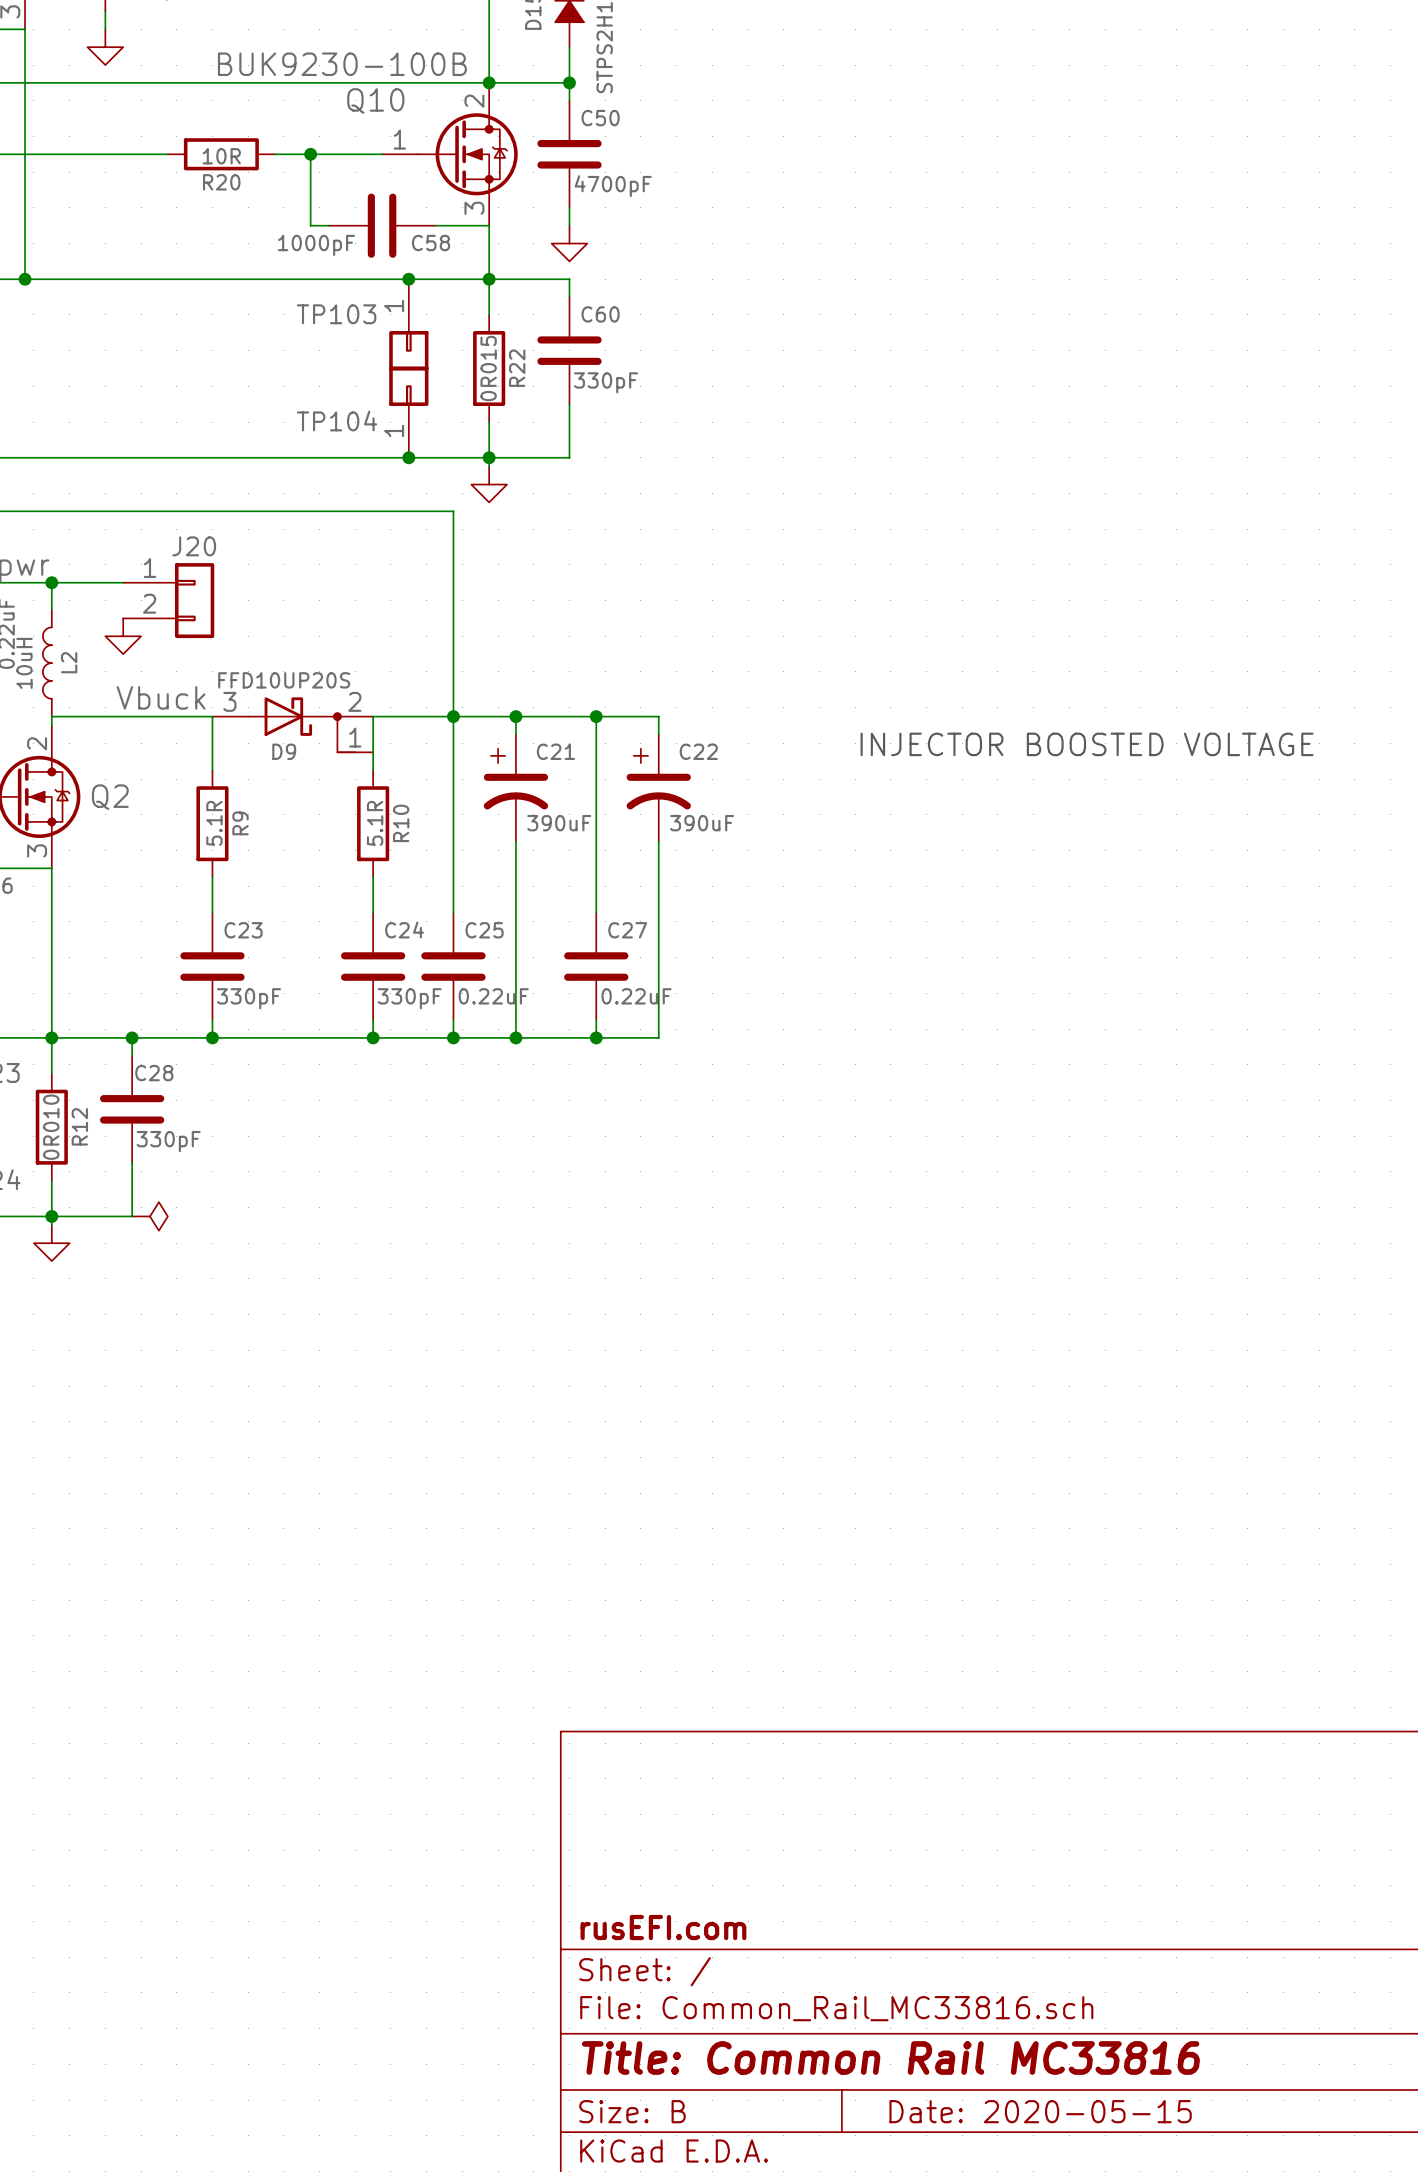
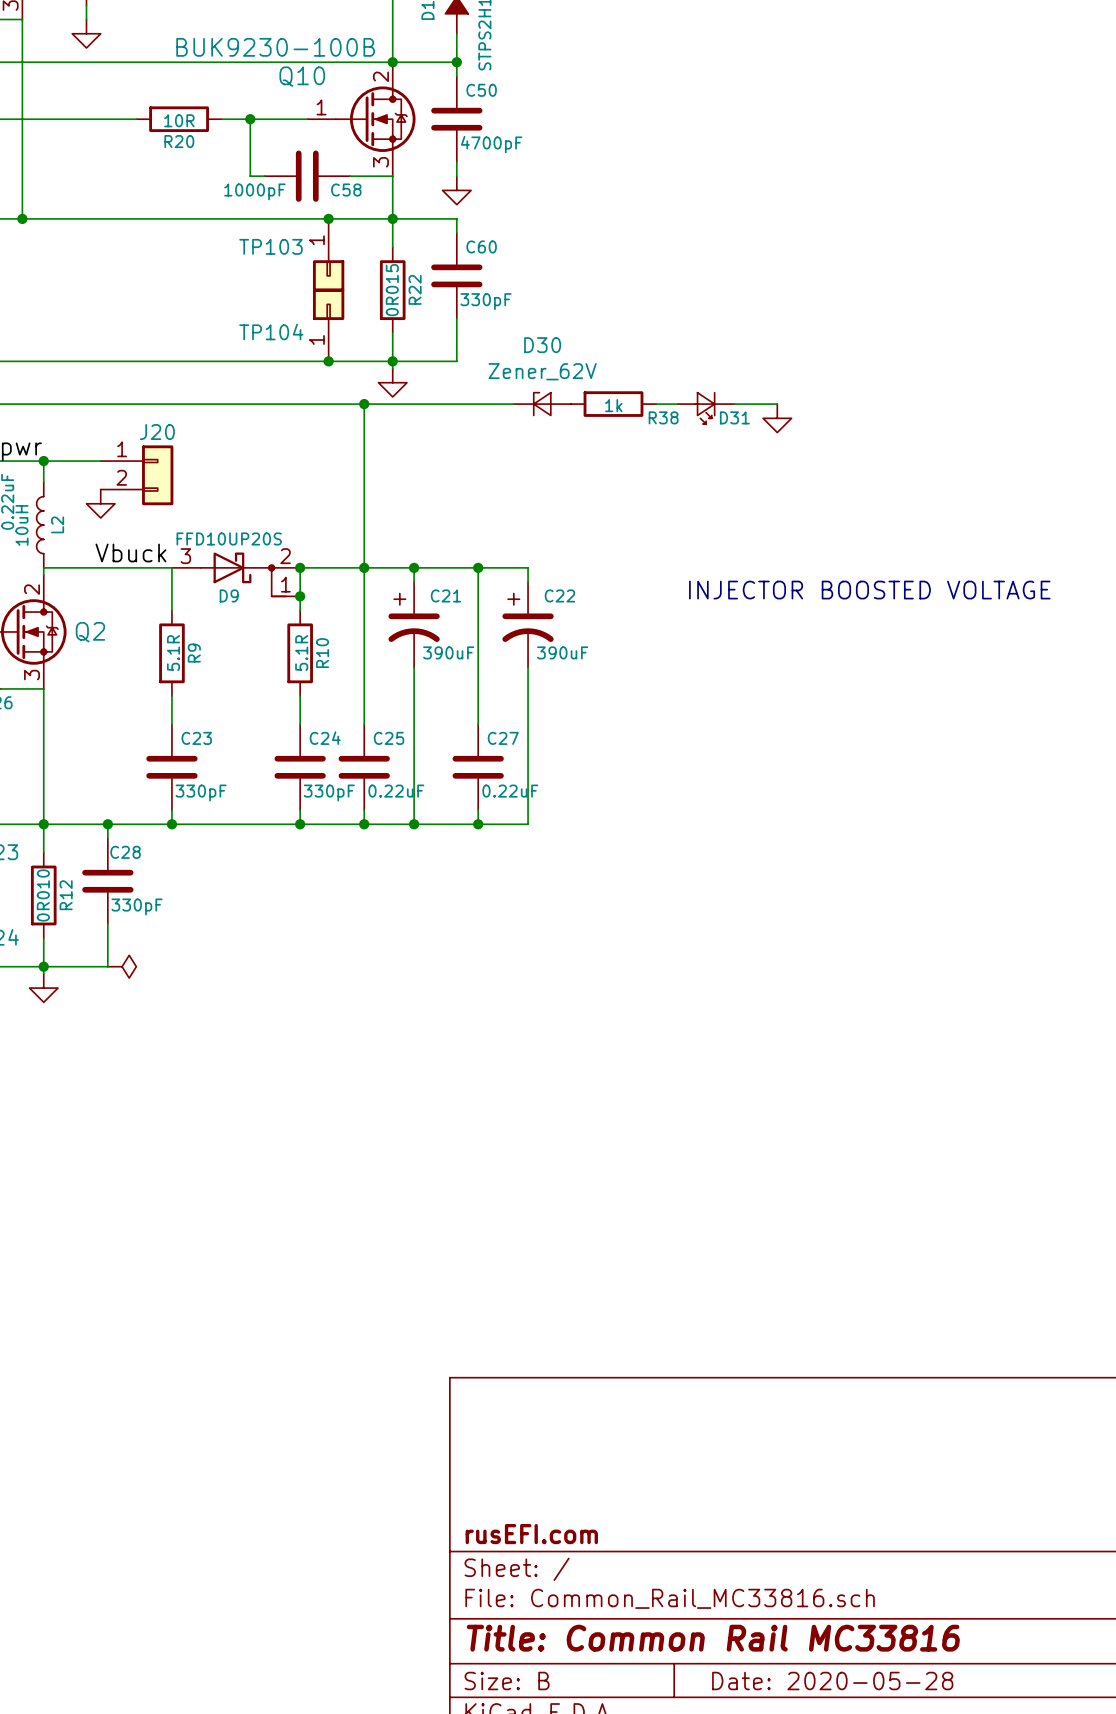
wire: none -> (364, 404) (513, 404)
junction: none -> (364, 404)
D30: none -> Zener_62V (542, 404)
R38: none -> 1k (613, 404)
wire: none -> (656, 404) (677, 404)
wire: none -> (734, 404) (777, 404)
D31: none -> (706, 408)
power symbol: none -> (777, 418)
junction: none -> (300, 567)
junction: none -> (300, 596)
title block: Date: 2020-05-15 (1040, 2111) -> Date: 2020-05-28 (832, 1681)

